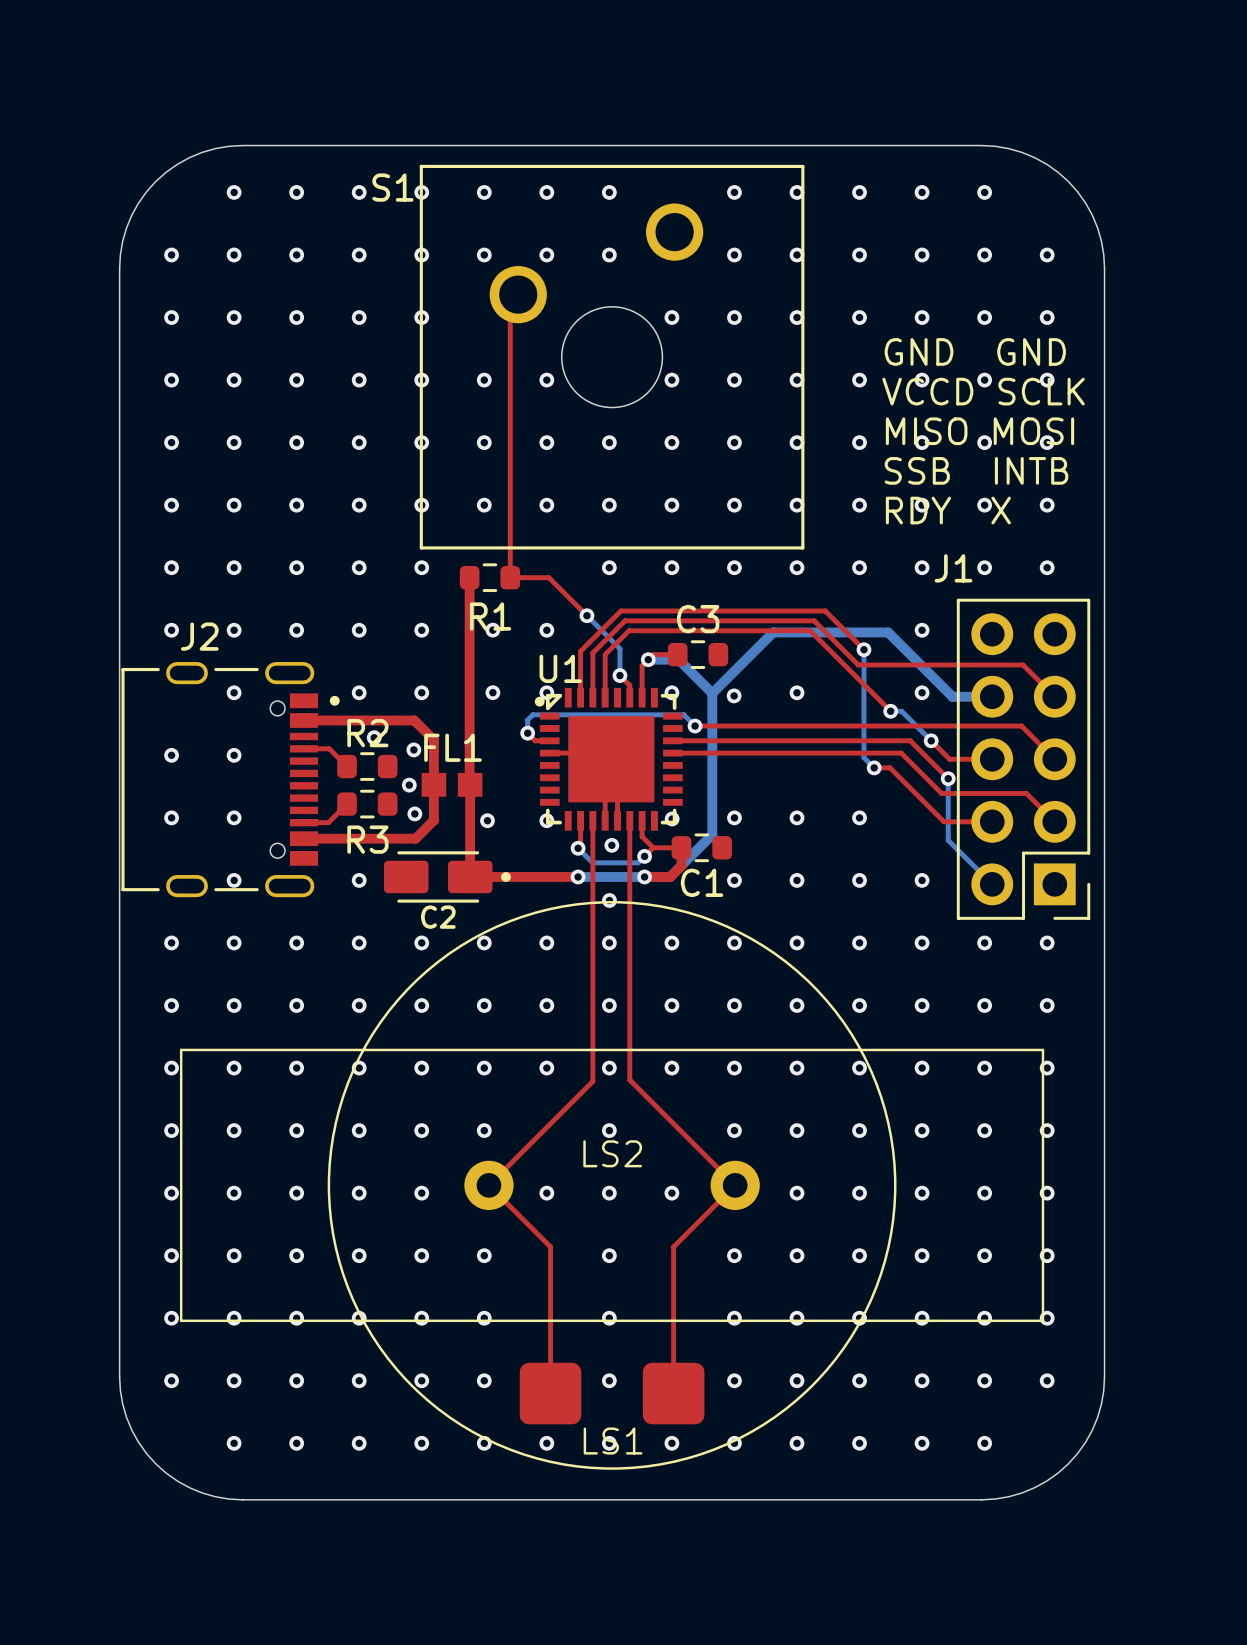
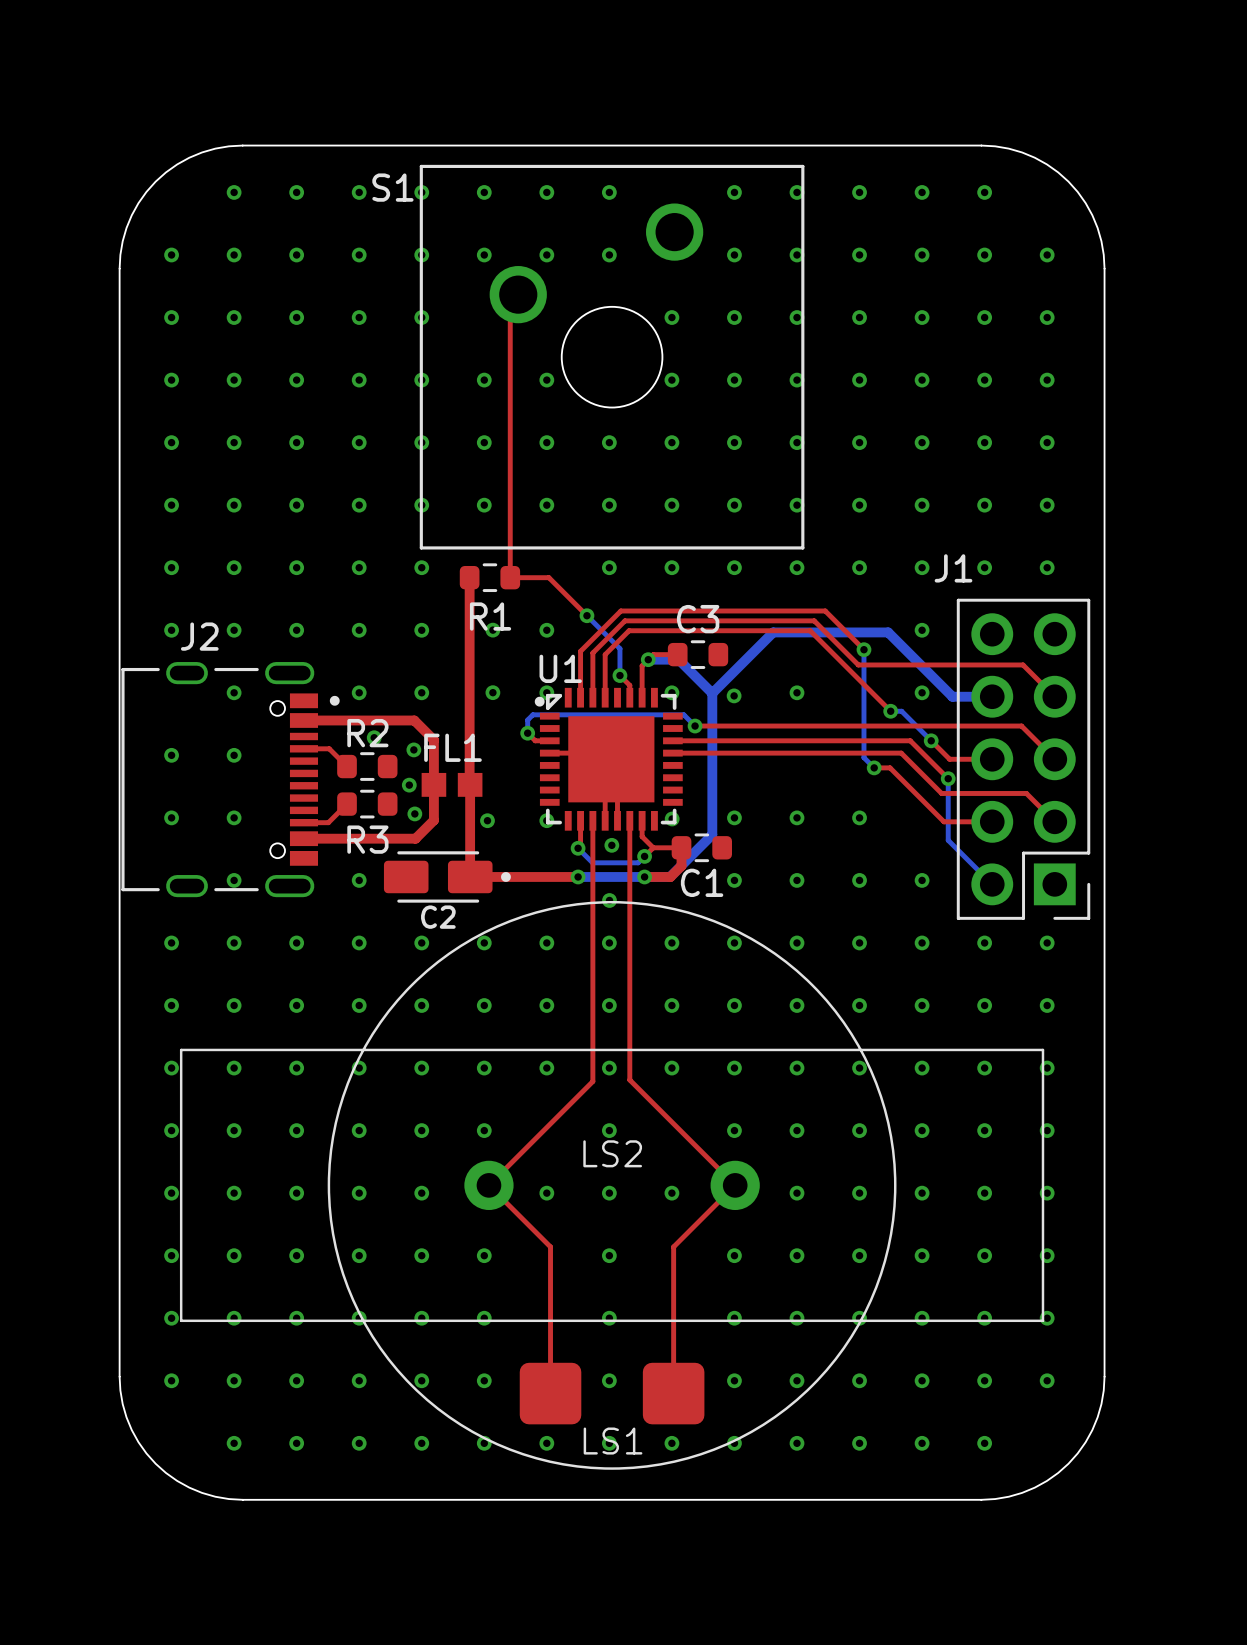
text: GND GND (975, 351) -> none
text: VCCD SCLK (983, 391) -> none
text: MISO MOSI (980, 431) -> none
text: SSB INTB (976, 470) -> none
text: RDY X (948, 510) -> none

